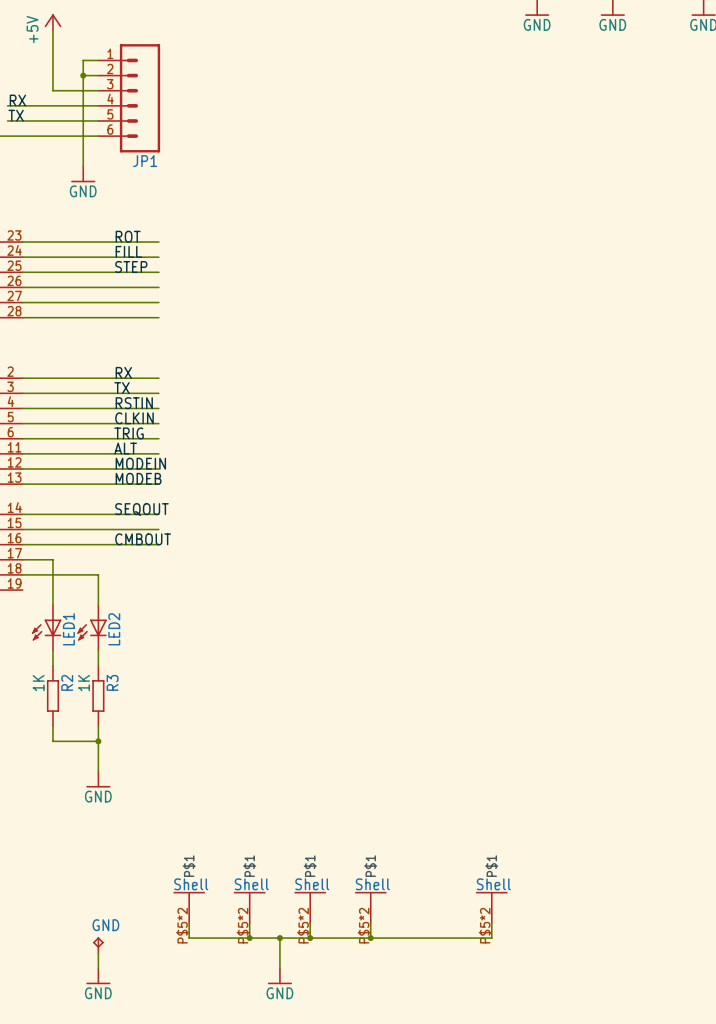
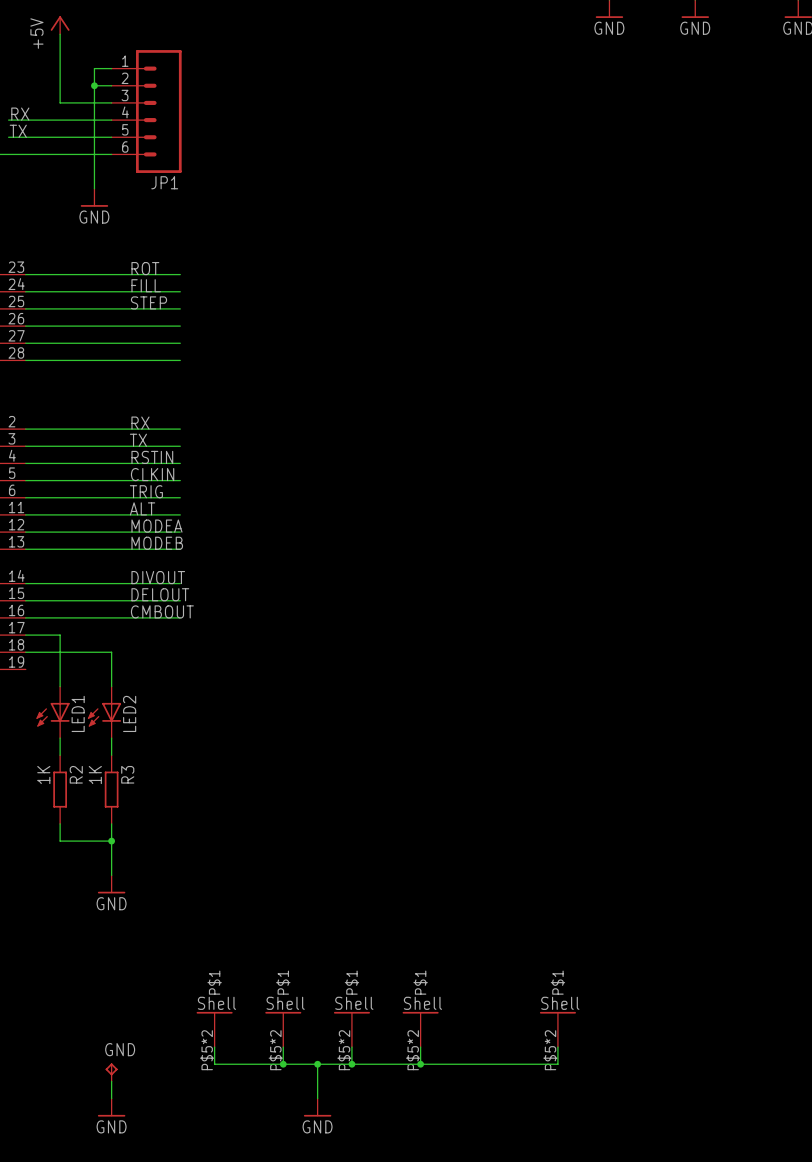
label: MODEIN (140, 463) -> MODEA (156, 526)
label: SEQOUT (141, 509) -> DIVOUT (158, 577)
label: none -> DELOUT (160, 594)

